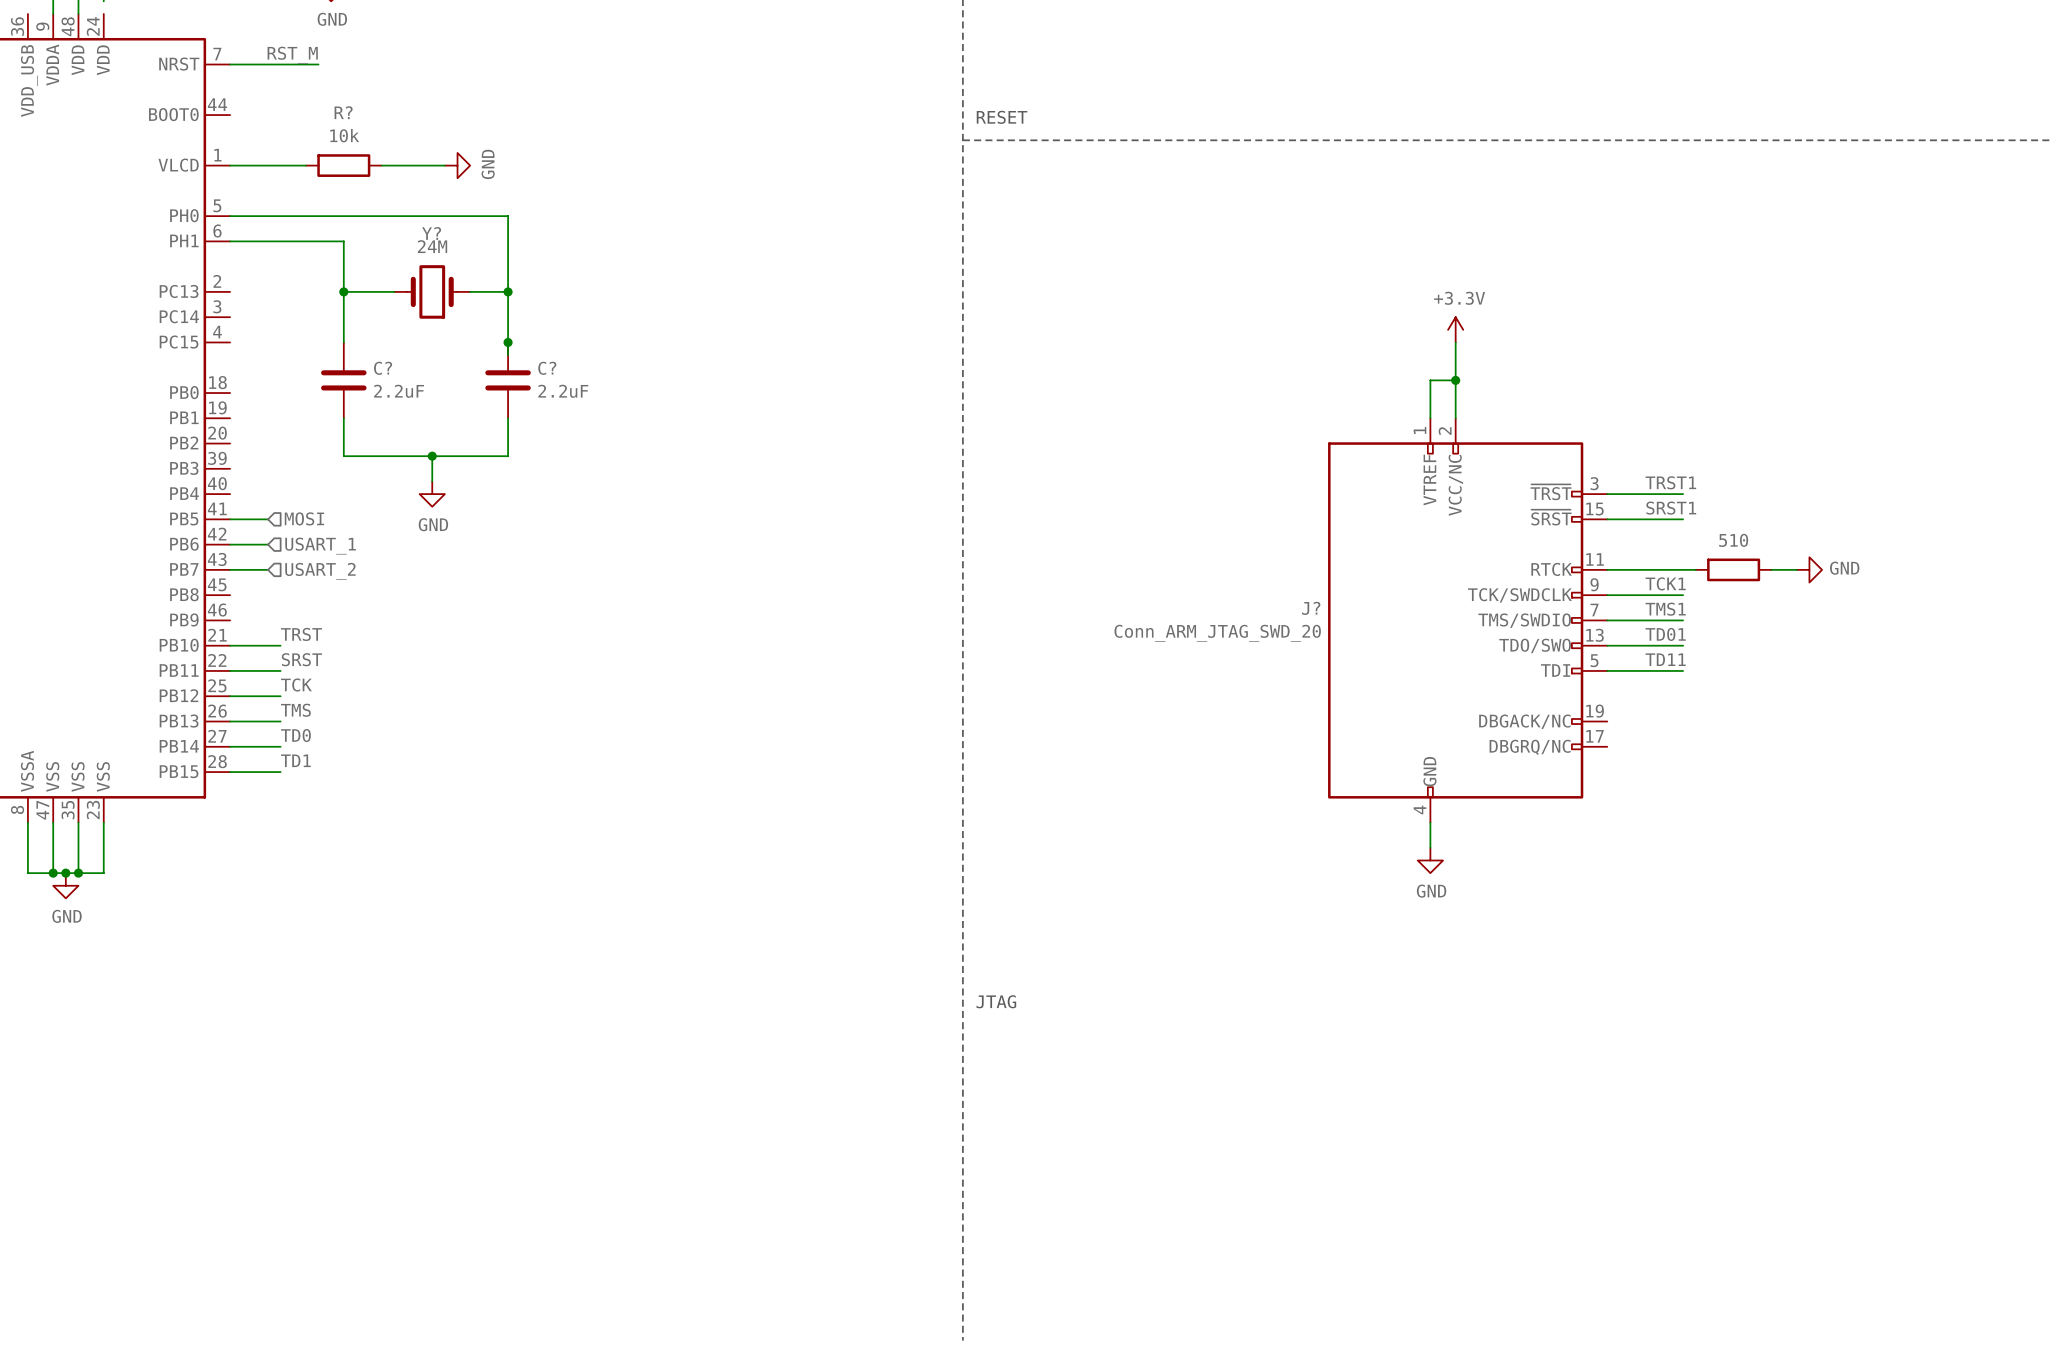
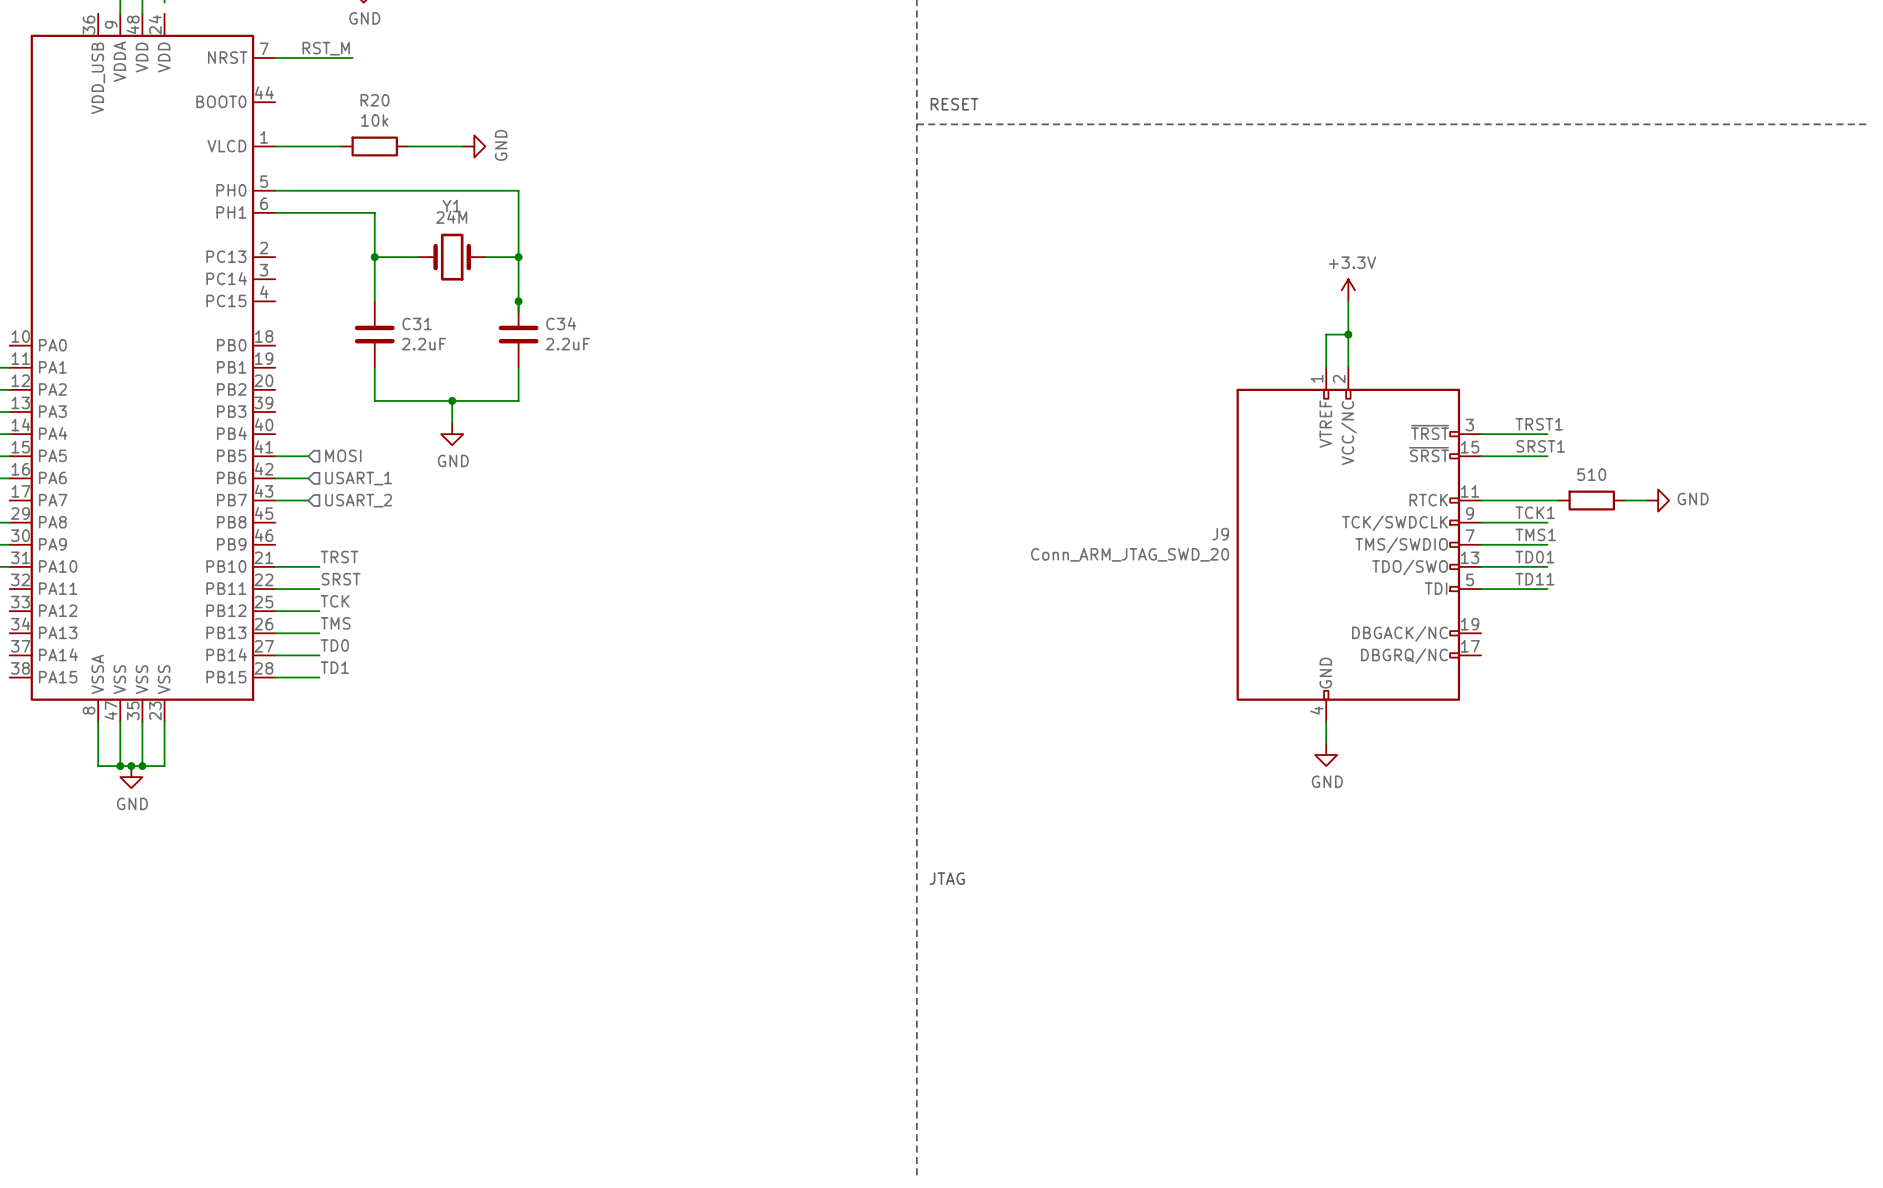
R? name: R? (343, 112) -> R20 (375, 100)
Y? name: Y? (431, 233) -> Y1 (451, 206)
C? name: C? (383, 368) -> C31 (417, 323)
C? name: C? (547, 368) -> C34 (561, 323)
J? name: J? (1311, 608) -> J9 (1220, 534)

